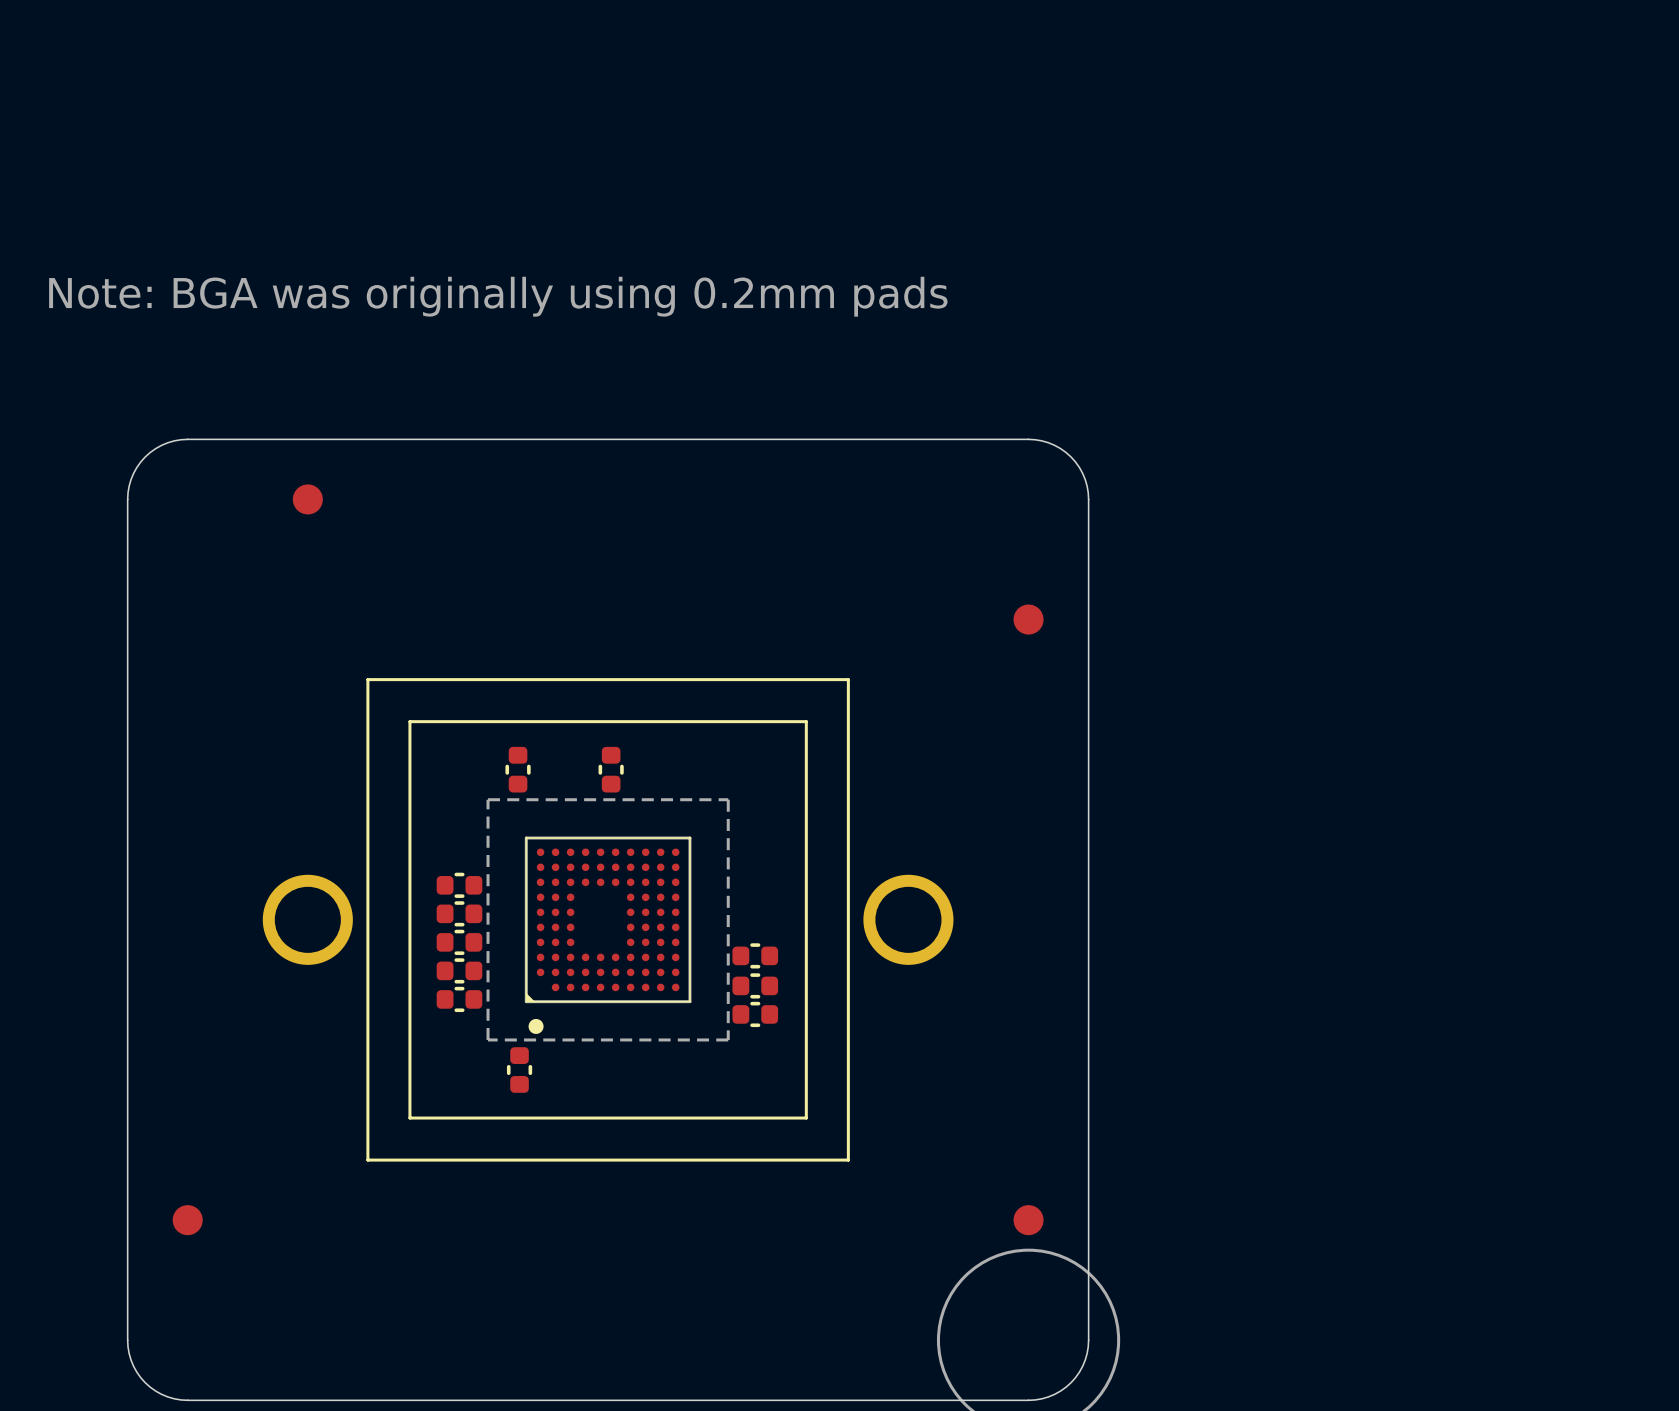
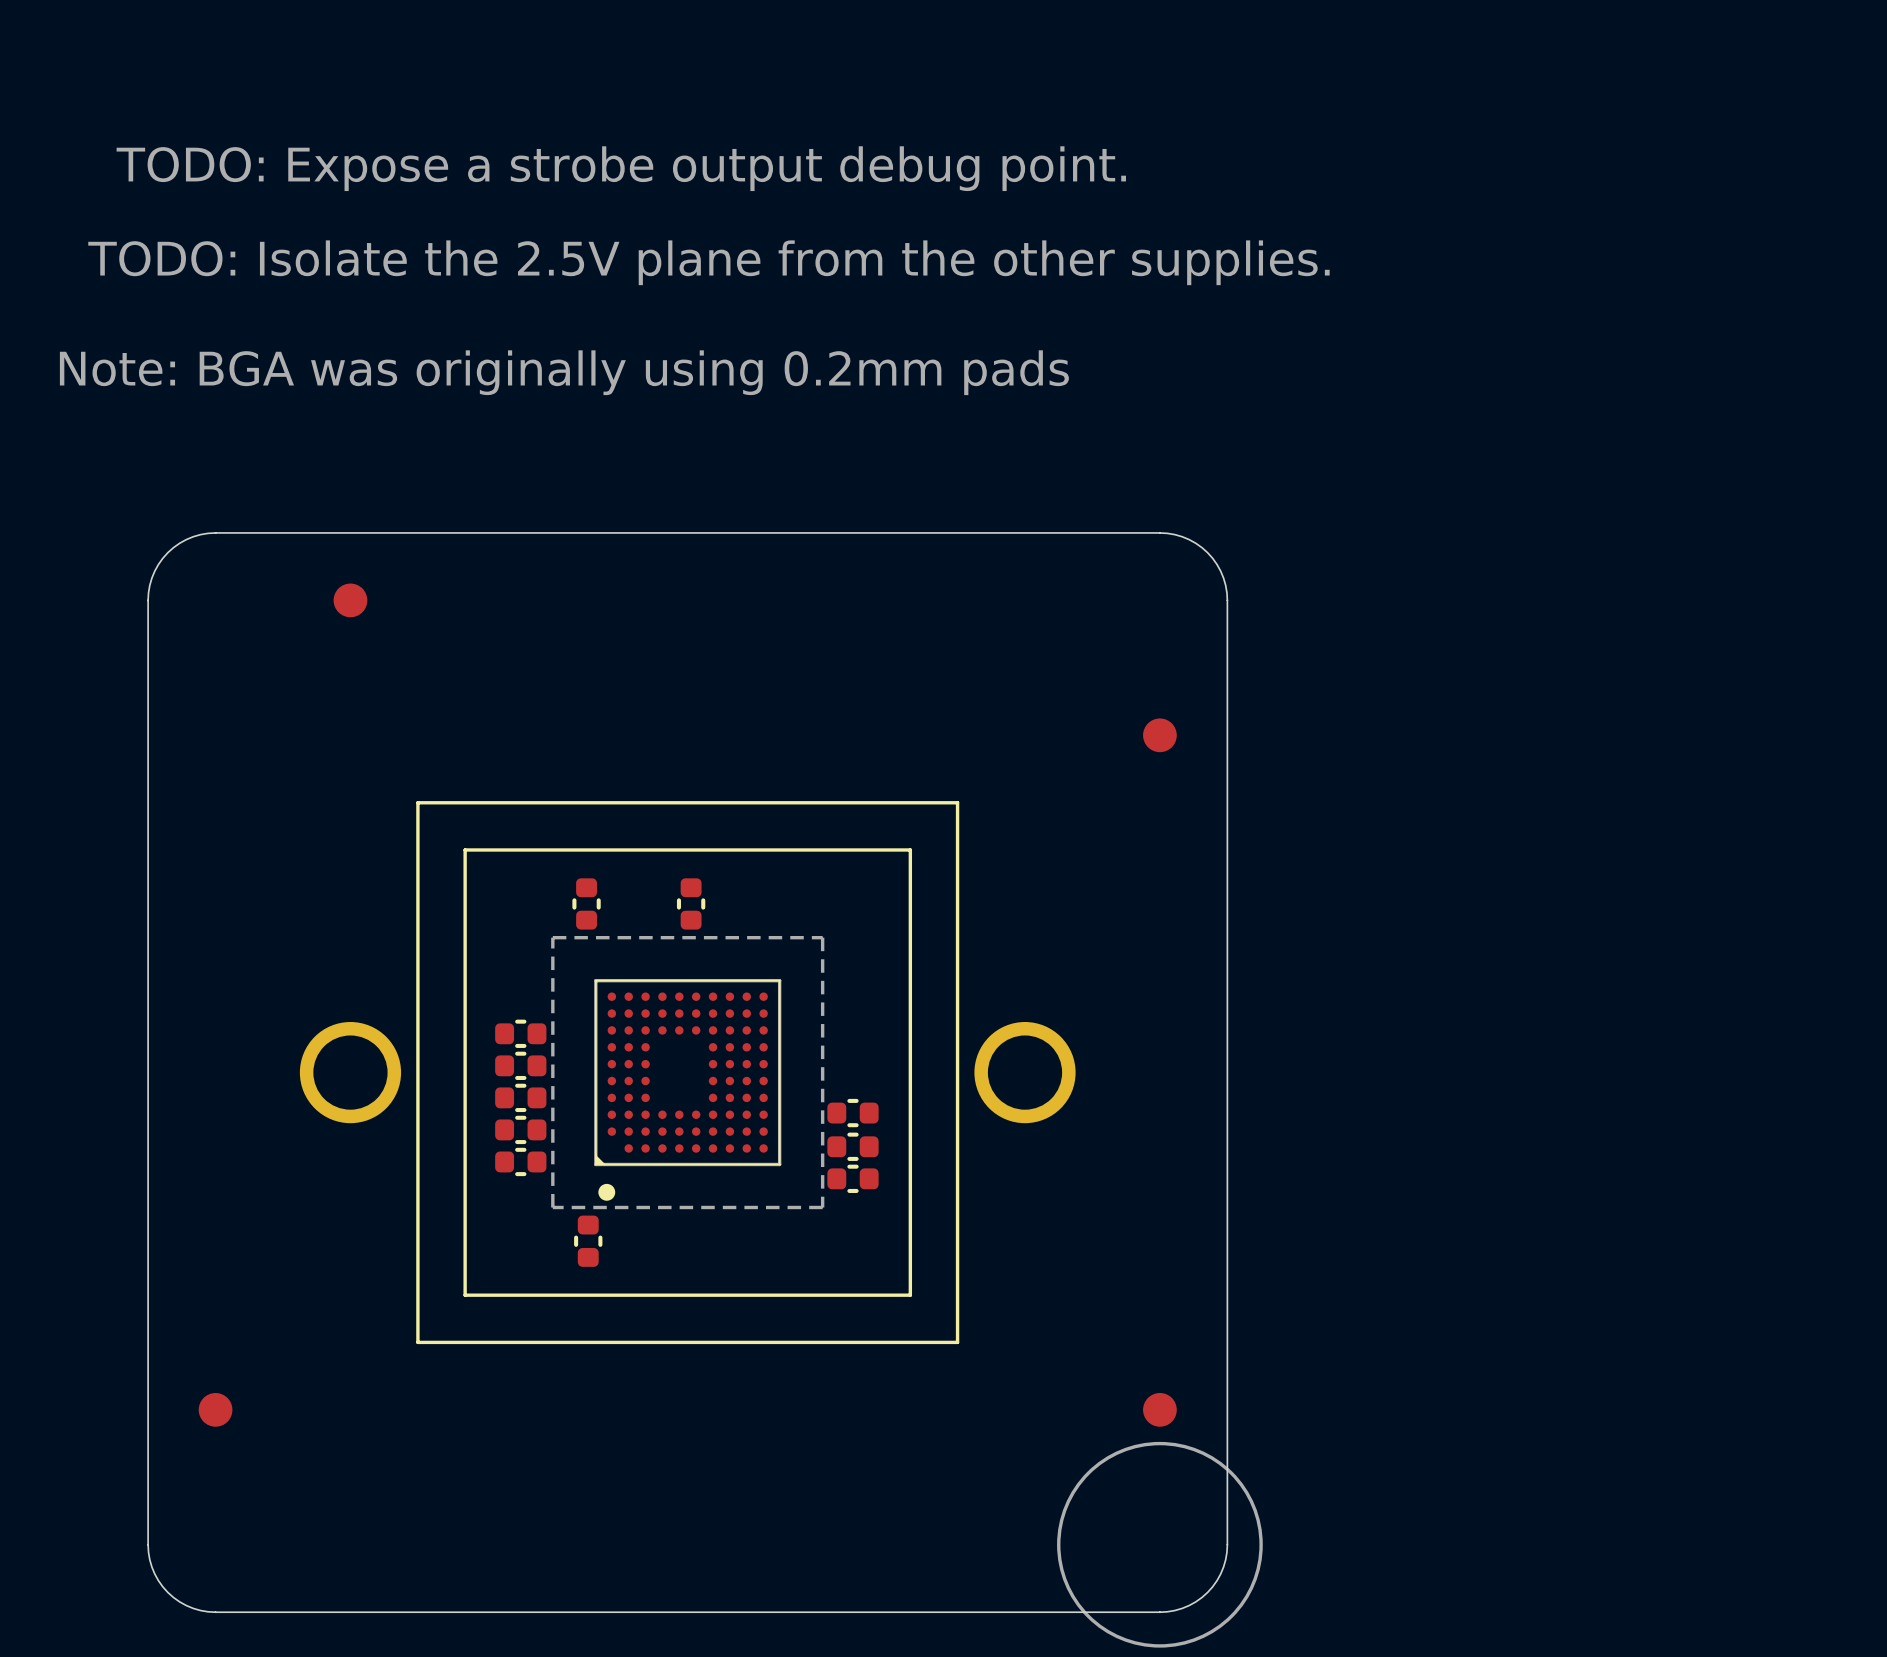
text: none -> TODO: Expose a strobe output debug point. (621, 168)
text: none -> TODO: Isolate the 2.5V plane from the other supplies. (708, 262)

